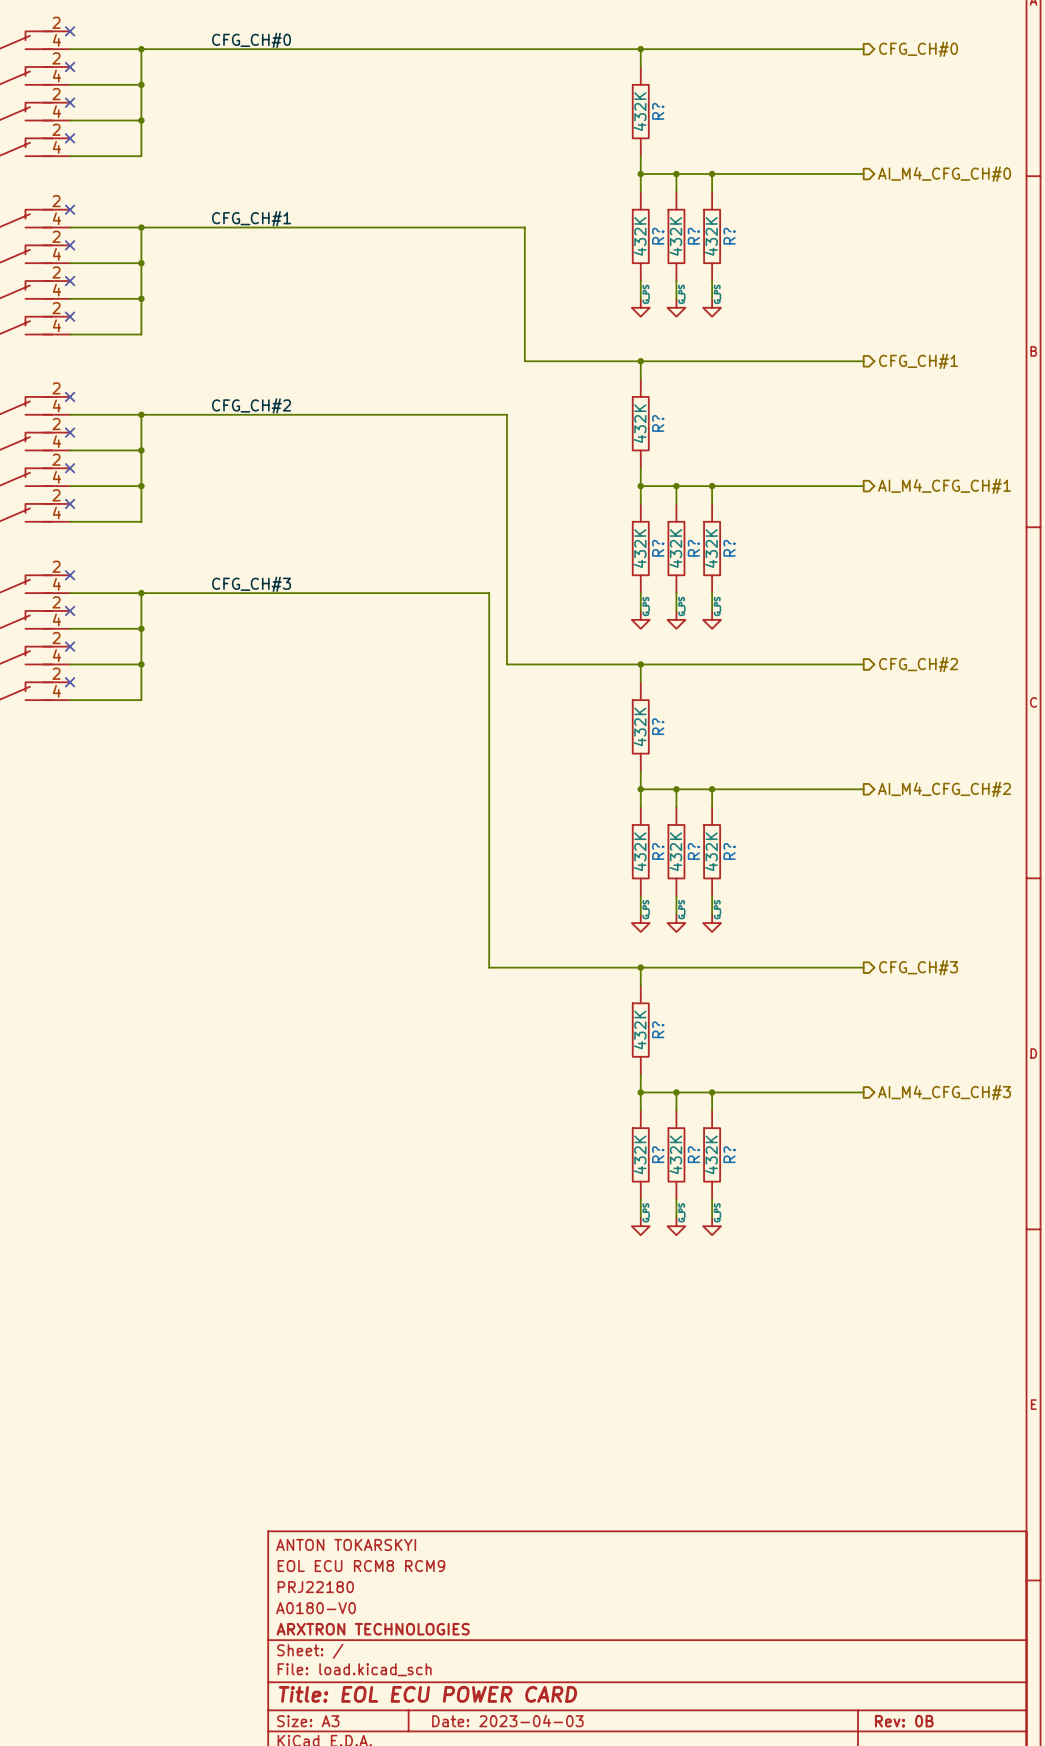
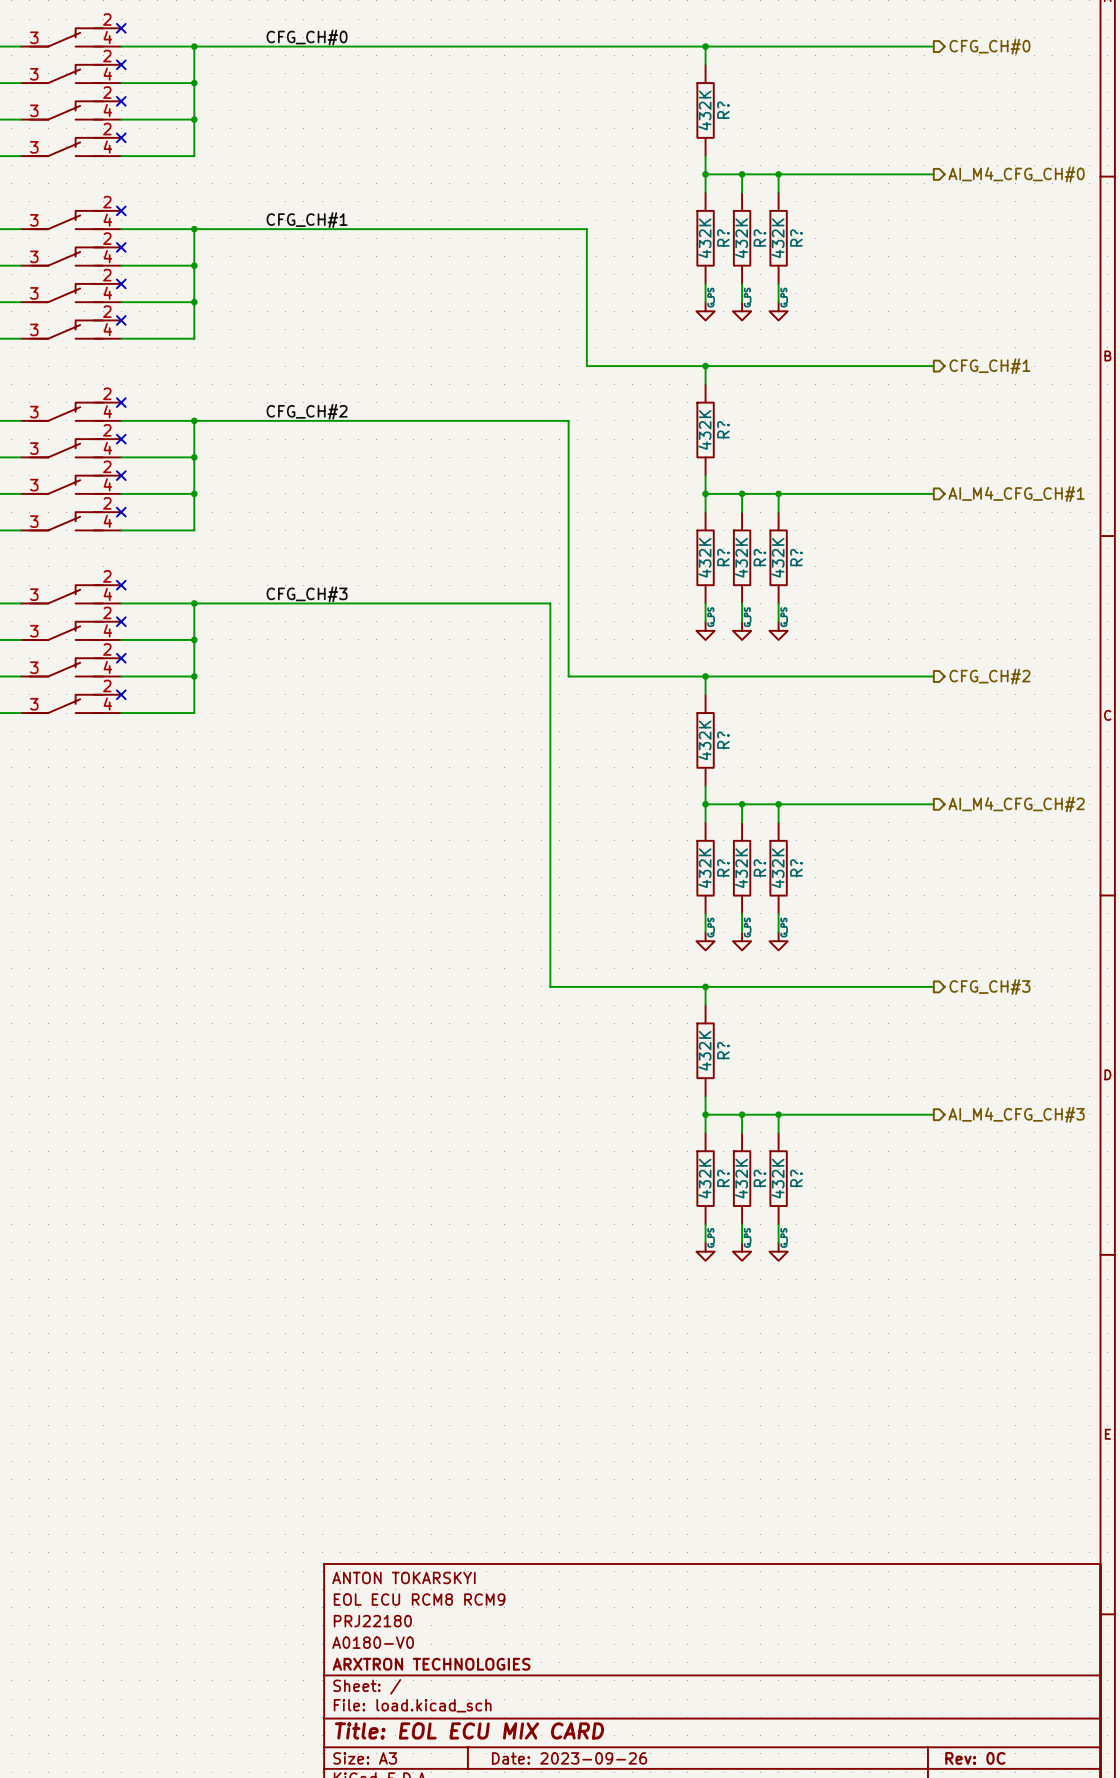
title block: Title: EOL ECU POWER CARD (427, 1694) -> Title: EOL ECU MIX CARD (469, 1730)
title block: Date: 2023-04-03 (507, 1720) -> Date: 2023-09-26 (569, 1758)
title block: Rev: 0B (904, 1721) -> Rev: 0C (975, 1758)

